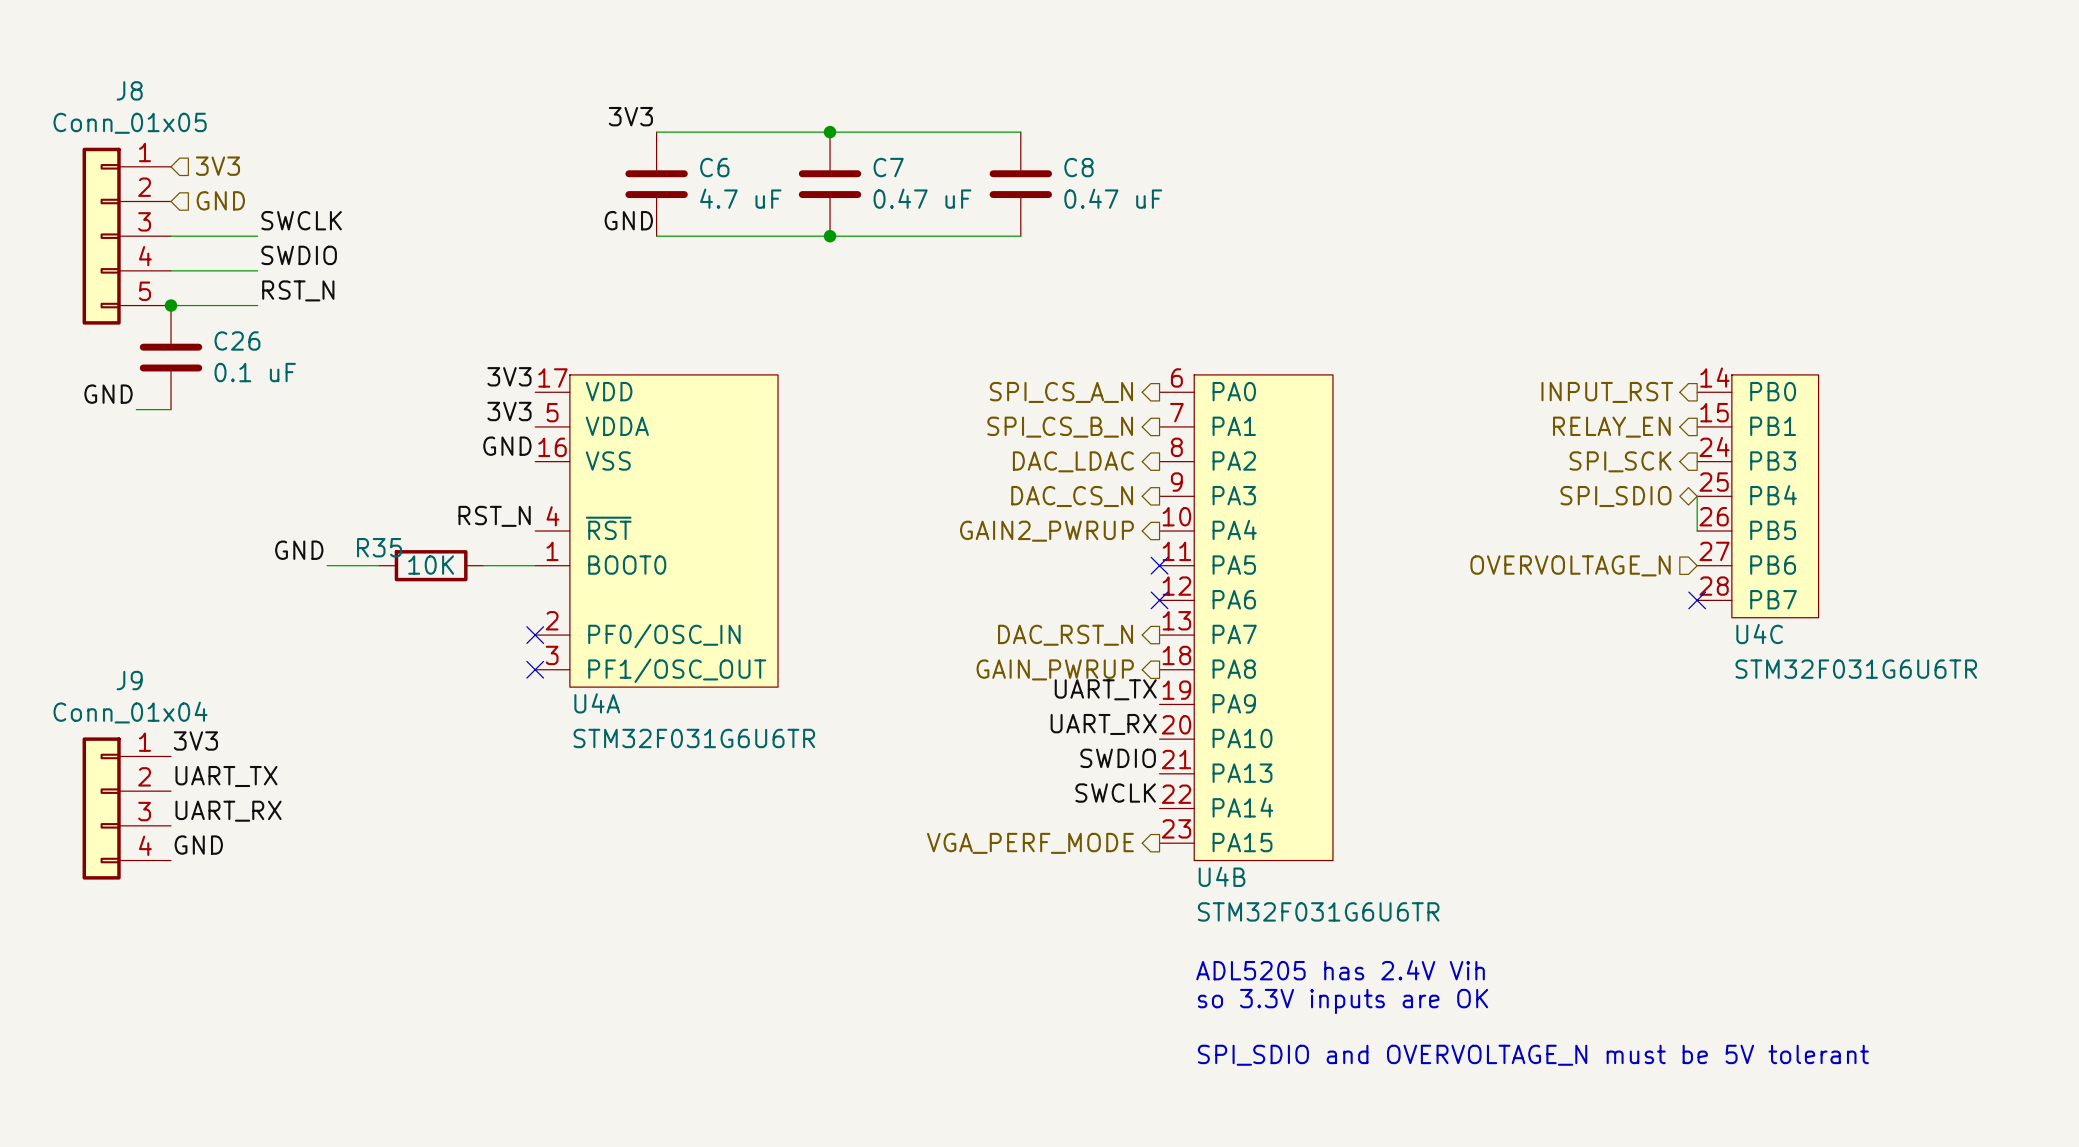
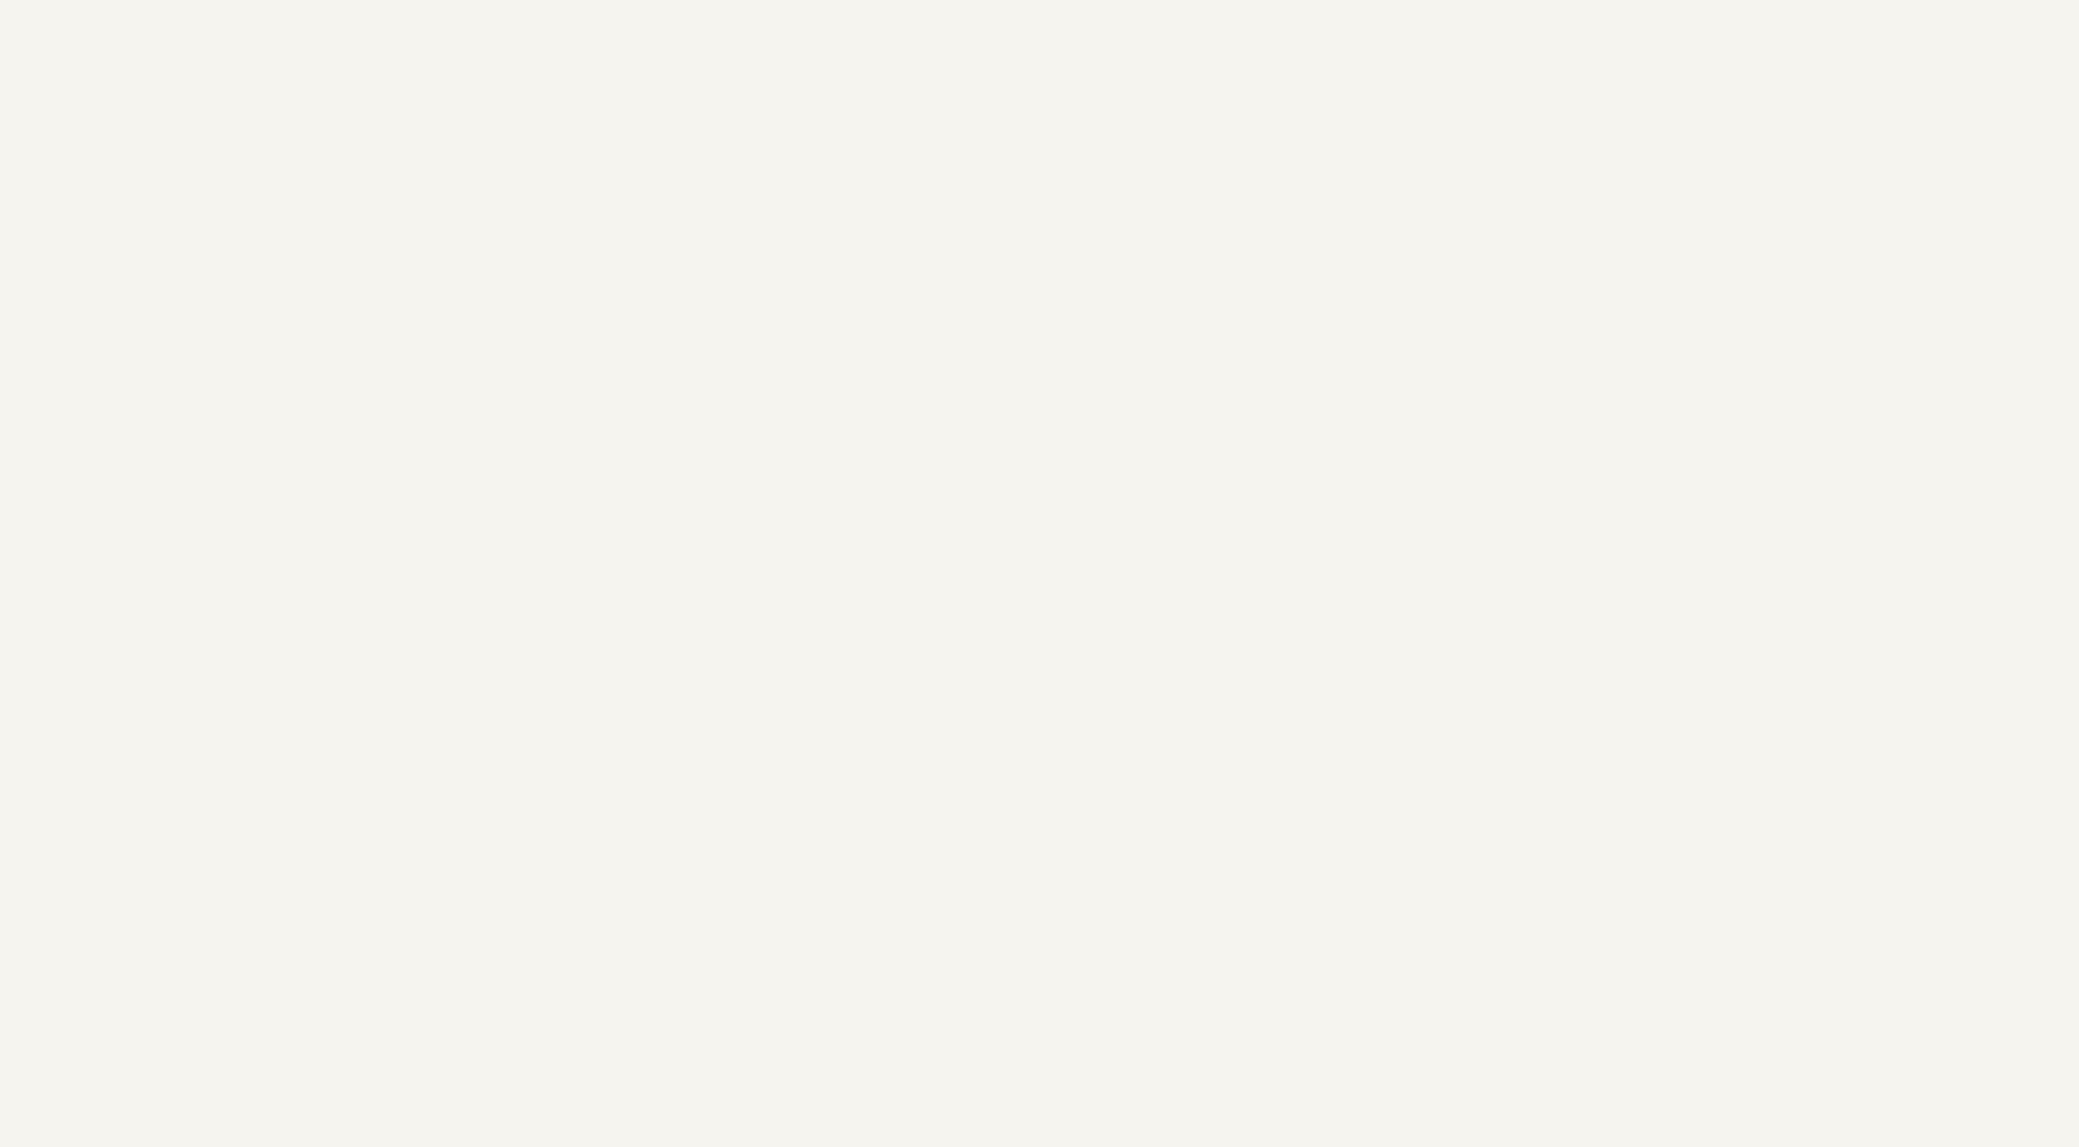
label: 3V3 (630, 116) -> none
wire: (656, 132) (1020, 132) -> none
junction: (830, 132) -> none
hierarchical label: 3V3 (217, 166) -> none
C6: 4.7 uF (656, 184) -> none
C7: 0.47 uF (830, 184) -> none
C8: 0.47 uF (1020, 184) -> none
hierarchical label: GND (220, 200) -> none
label: SWCLK (301, 220) -> none
label: GND (628, 220) -> none
J8: Conn_01x05 (126, 236) -> none
wire: (171, 236) (257, 236) -> none
wire: (656, 236) (1020, 236) -> none
junction: (830, 236) -> none
label: SWDIO (299, 255) -> none
wire: (171, 270) (257, 270) -> none
label: RST_N (298, 290) -> none
wire: (171, 305) (257, 305) -> none
junction: (171, 305) -> none
C26: 0.1 uF (171, 357) -> none
label: 3V3 (509, 376) -> none
hierarchical label: SPI_CS_A_N (1061, 392) -> none
hierarchical label: INPUT_RST (1607, 392) -> none
label: GND (108, 394) -> none
wire: (136, 409) (171, 409) -> none
label: 3V3 (509, 411) -> none
hierarchical label: SPI_CS_B_N (1060, 427) -> none
hierarchical label: RELAY_EN (1611, 427) -> none
label: GND (507, 446) -> none
hierarchical label: DAC_LDAC (1073, 461) -> none
hierarchical label: SPI_SCK (1620, 461) -> none
hierarchical label: DAC_CS_N (1072, 496) -> none
hierarchical label: SPI_SDIO (1615, 496) -> none
wire: (1697, 496) (1697, 531) -> none
U4C: STM32F031G6U6TR (1757, 496) -> none
label: RST_N (494, 516) -> none
U4A: STM32F031G6U6TR (656, 531) -> none
hierarchical label: GAIN2_PWRUP (1046, 531) -> none
label: GND (299, 550) -> none
wire: (327, 565) (379, 565) -> none
R35: 10K (431, 565) -> none
wire: (483, 565) (535, 565) -> none
no-connect mark: (1159, 565) -> none
hierarchical label: OVERVOLTAGE_N (1570, 565) -> none
no-connect mark: (1159, 600) -> none
no-connect mark: (1697, 600) -> none
U4B: STM32F031G6U6TR (1246, 617) -> none
no-connect mark: (535, 635) -> none
hierarchical label: DAC_RST_N (1065, 635) -> none
no-connect mark: (535, 669) -> none
hierarchical label: GAIN_PWRUP (1055, 669) -> none
label: UART_TX (1105, 689) -> none
label: UART_RX (1103, 724) -> none
label: 3V3 (195, 740) -> none
label: SWDIO (1118, 758) -> none
label: UART_TX (226, 776) -> none
label: SWCLK (1115, 793) -> none
J9: Conn_01x04 (126, 808) -> none
label: UART_RX (228, 811) -> none
hierarchical label: VGA_PERF_MODE (1030, 843) -> none
label: GND (198, 845) -> none
text: ADL5205 has 2.4V Vih (1340, 970) -> none
text: so 3.3V inputs are OK (1343, 1001) -> none
text: SPI_SDIO and OVERVOLTAGE_N must be 5V tolerant (1533, 1055) -> none

